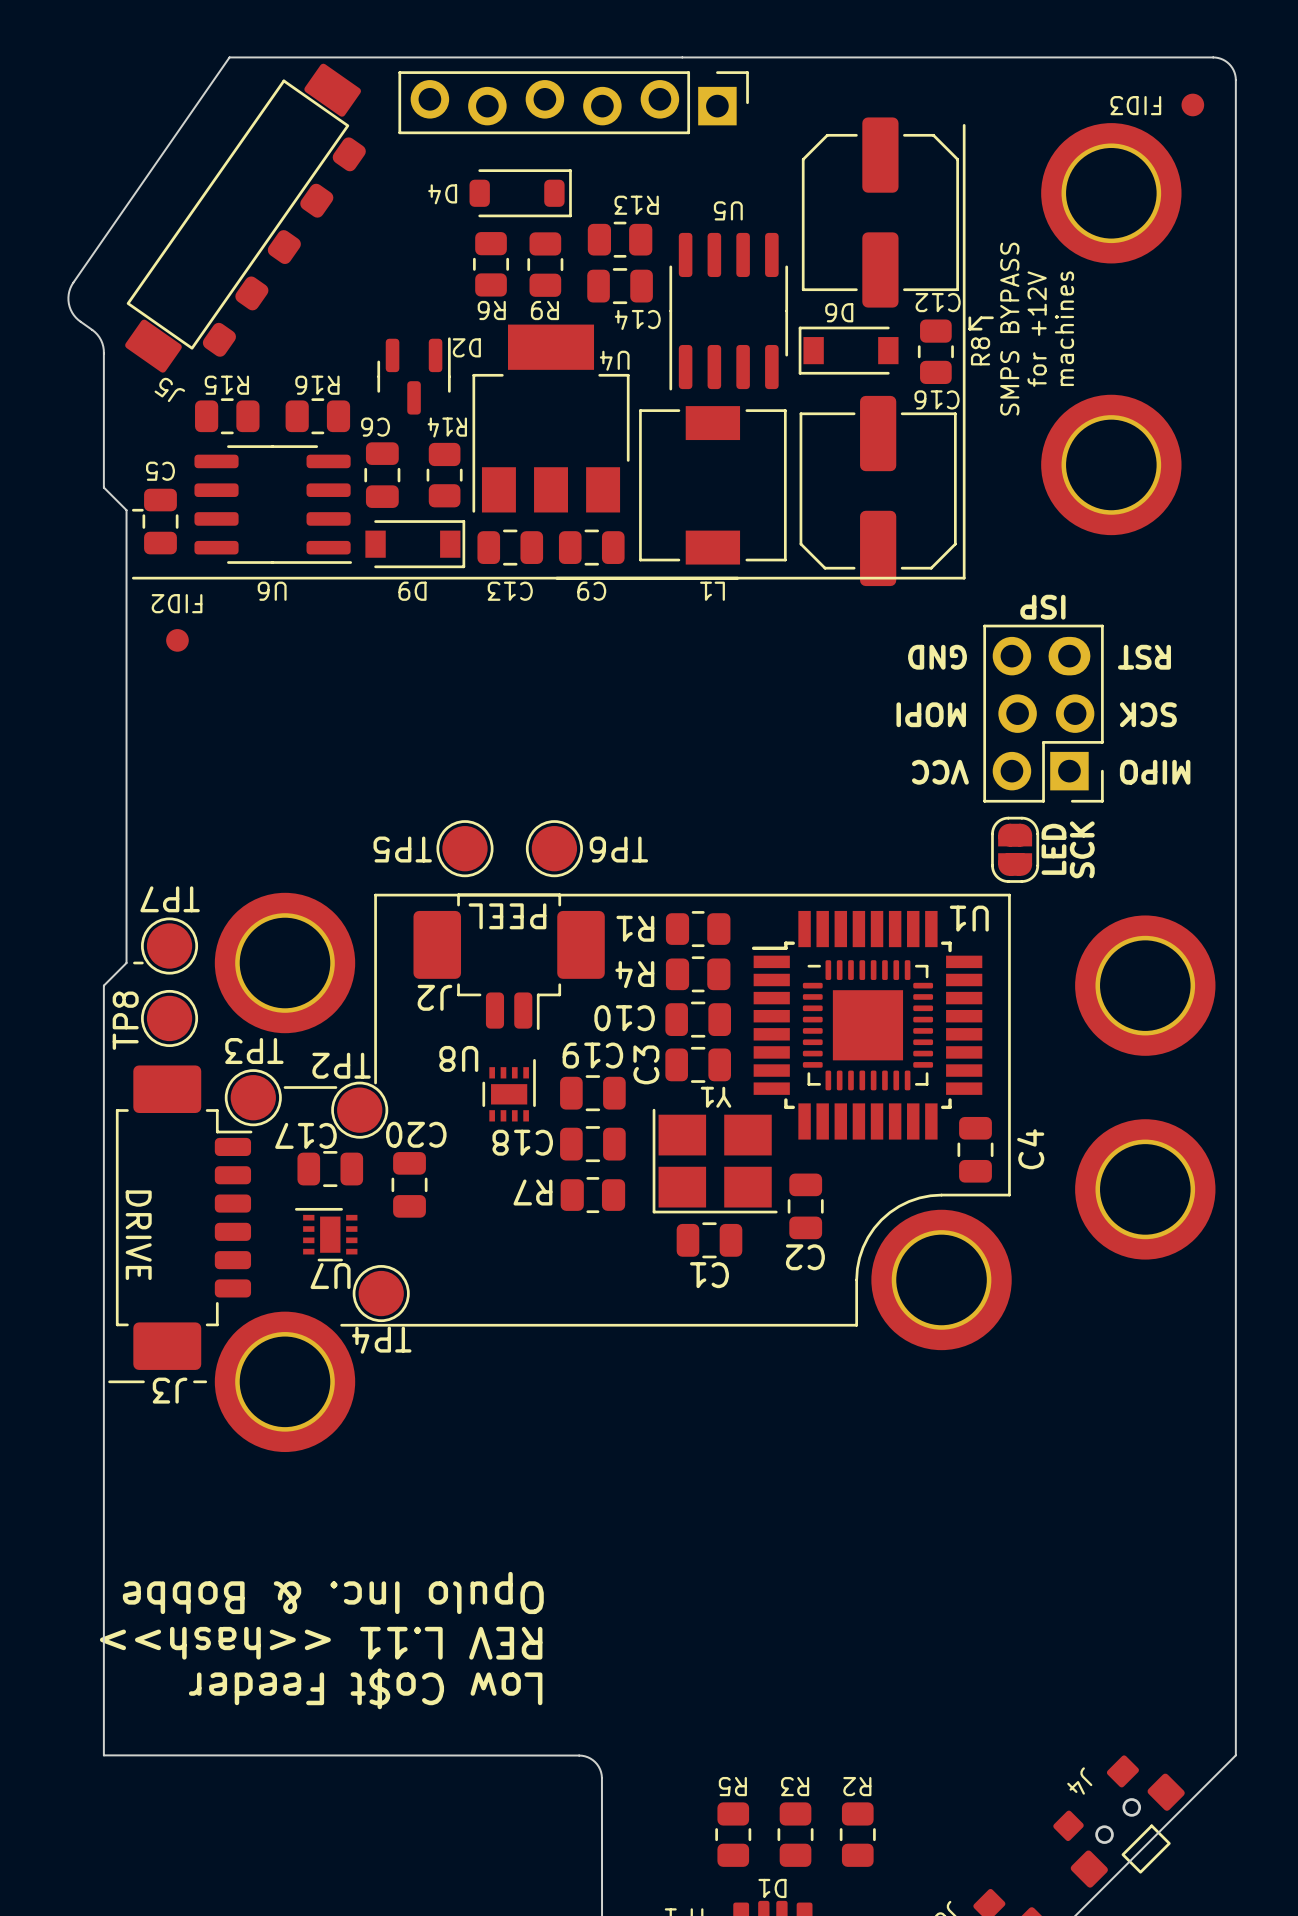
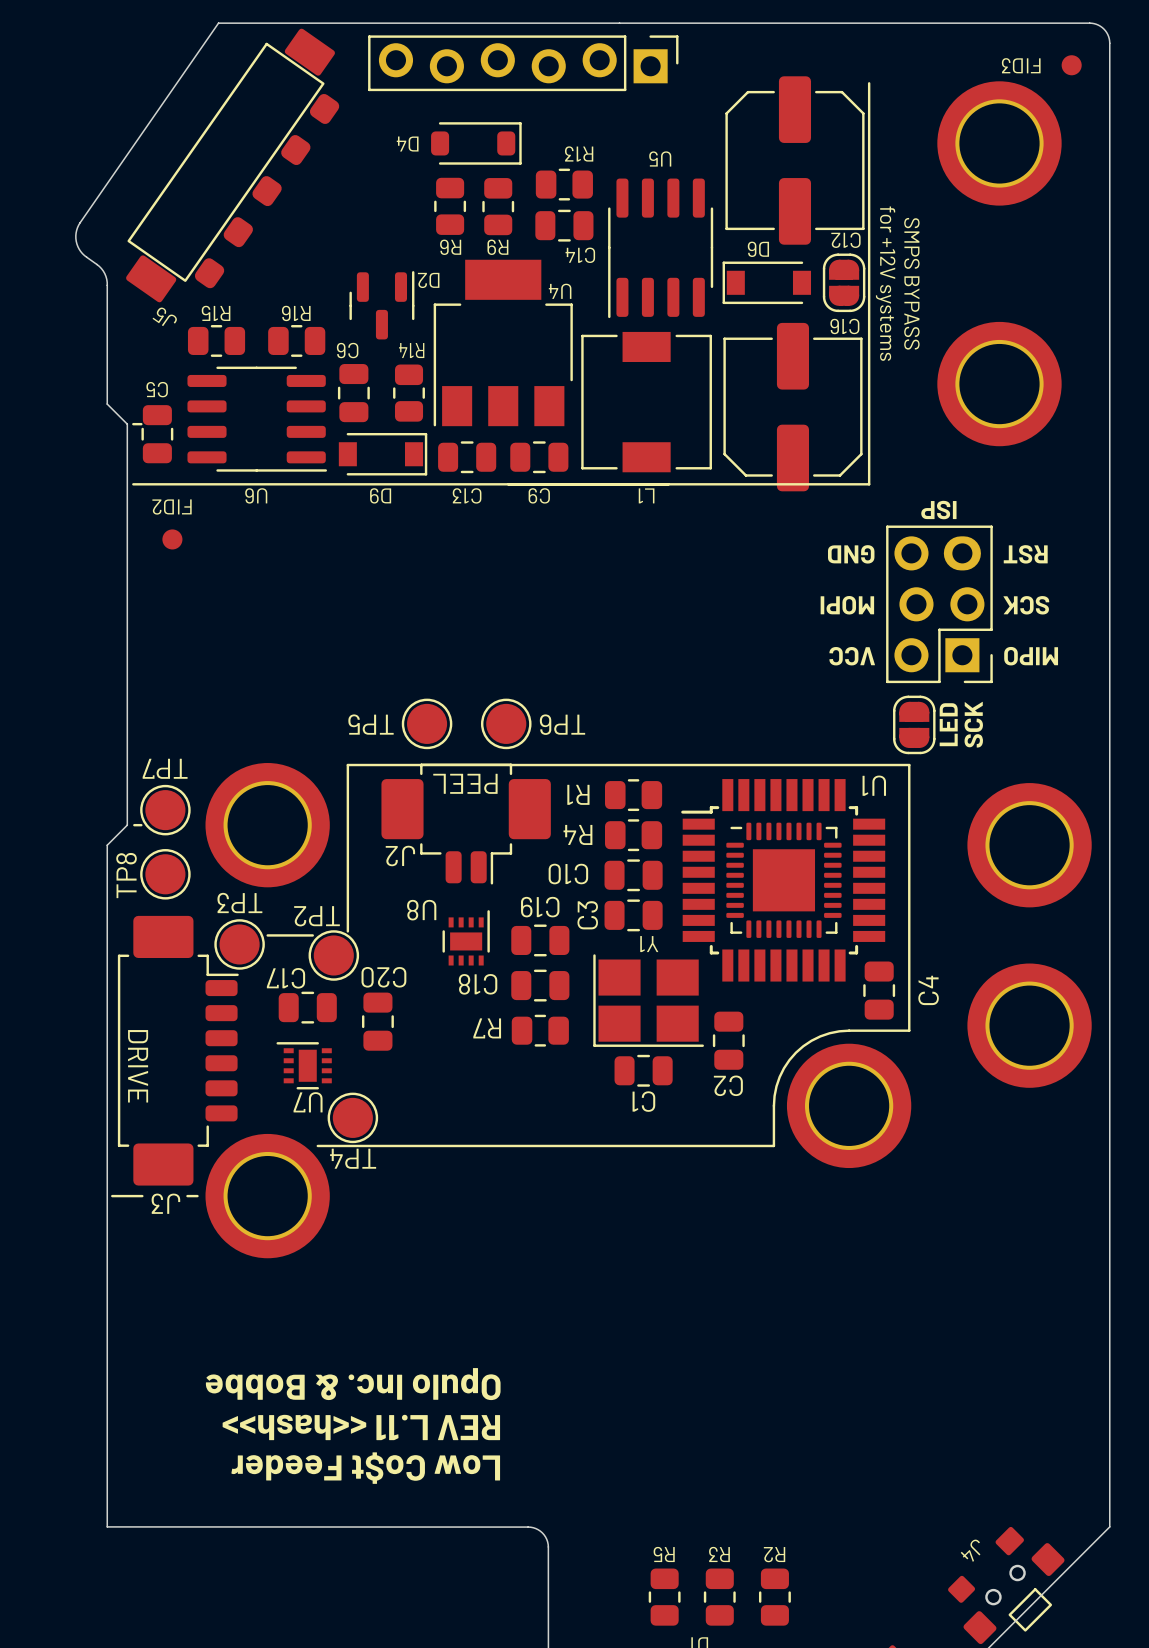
line: (969, 317) (969, 329) -> none
line: (992, 317) (981, 317) (969, 329) -> none
text: machines (1064, 328) -> none
line: (969, 329) (981, 329) -> none
text rotation: 0° (1009, 329) -> 180° (911, 283)
text: for +12V (1037, 329) -> none
part: none -> (844, 282)
text: none -> for +12V systems (885, 283)
R8: (935, 351) -> none

